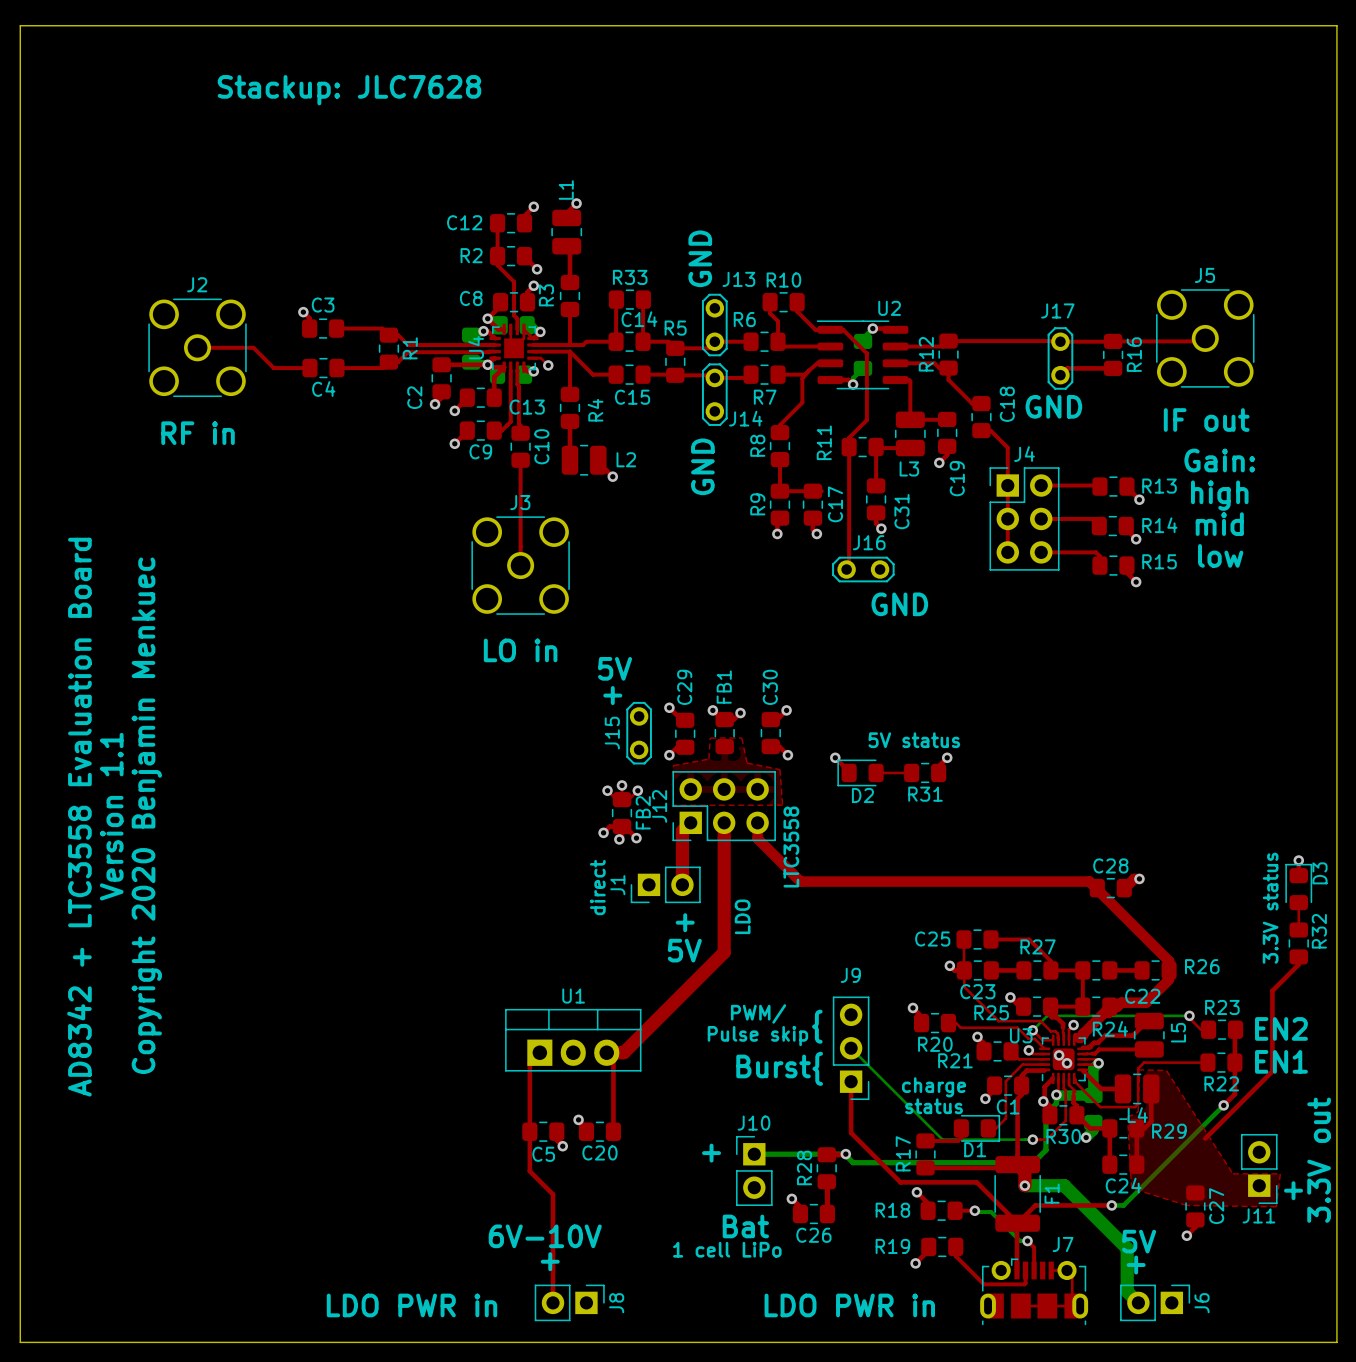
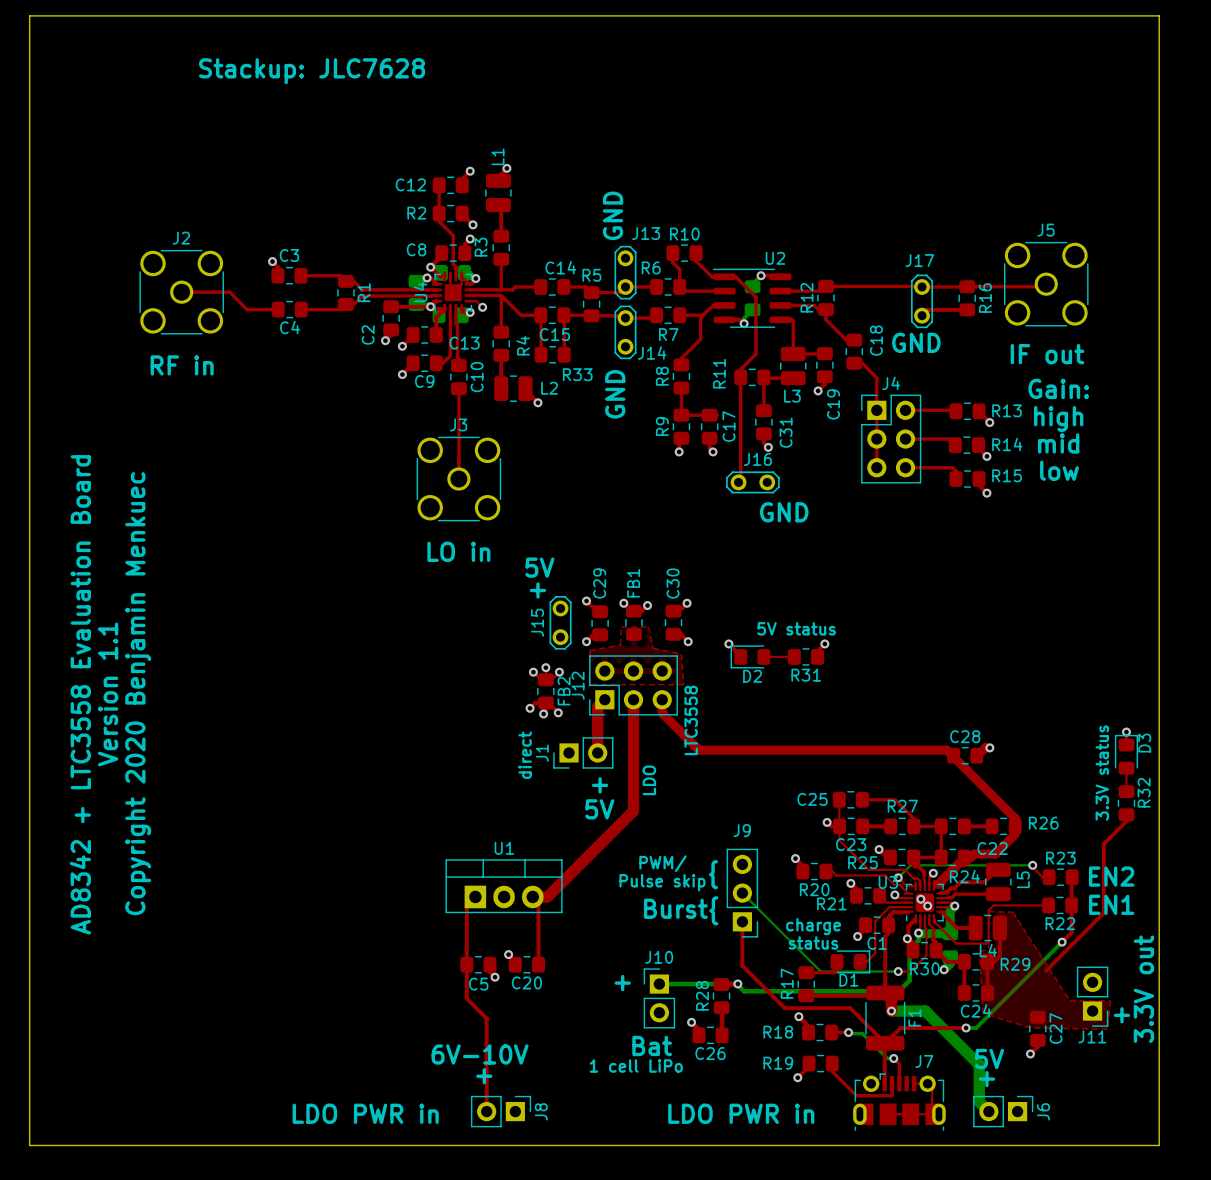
R33 name position: R33 (630, 277) -> R33 (577, 374)
top track: (616, 299) (616, 341) -> none
R33 position: (629, 299) -> (552, 354)
top track: (643, 299) (643, 341) -> none
top track: none -> (540, 315) (541, 354)
top track: none -> (563, 315) (564, 354)

